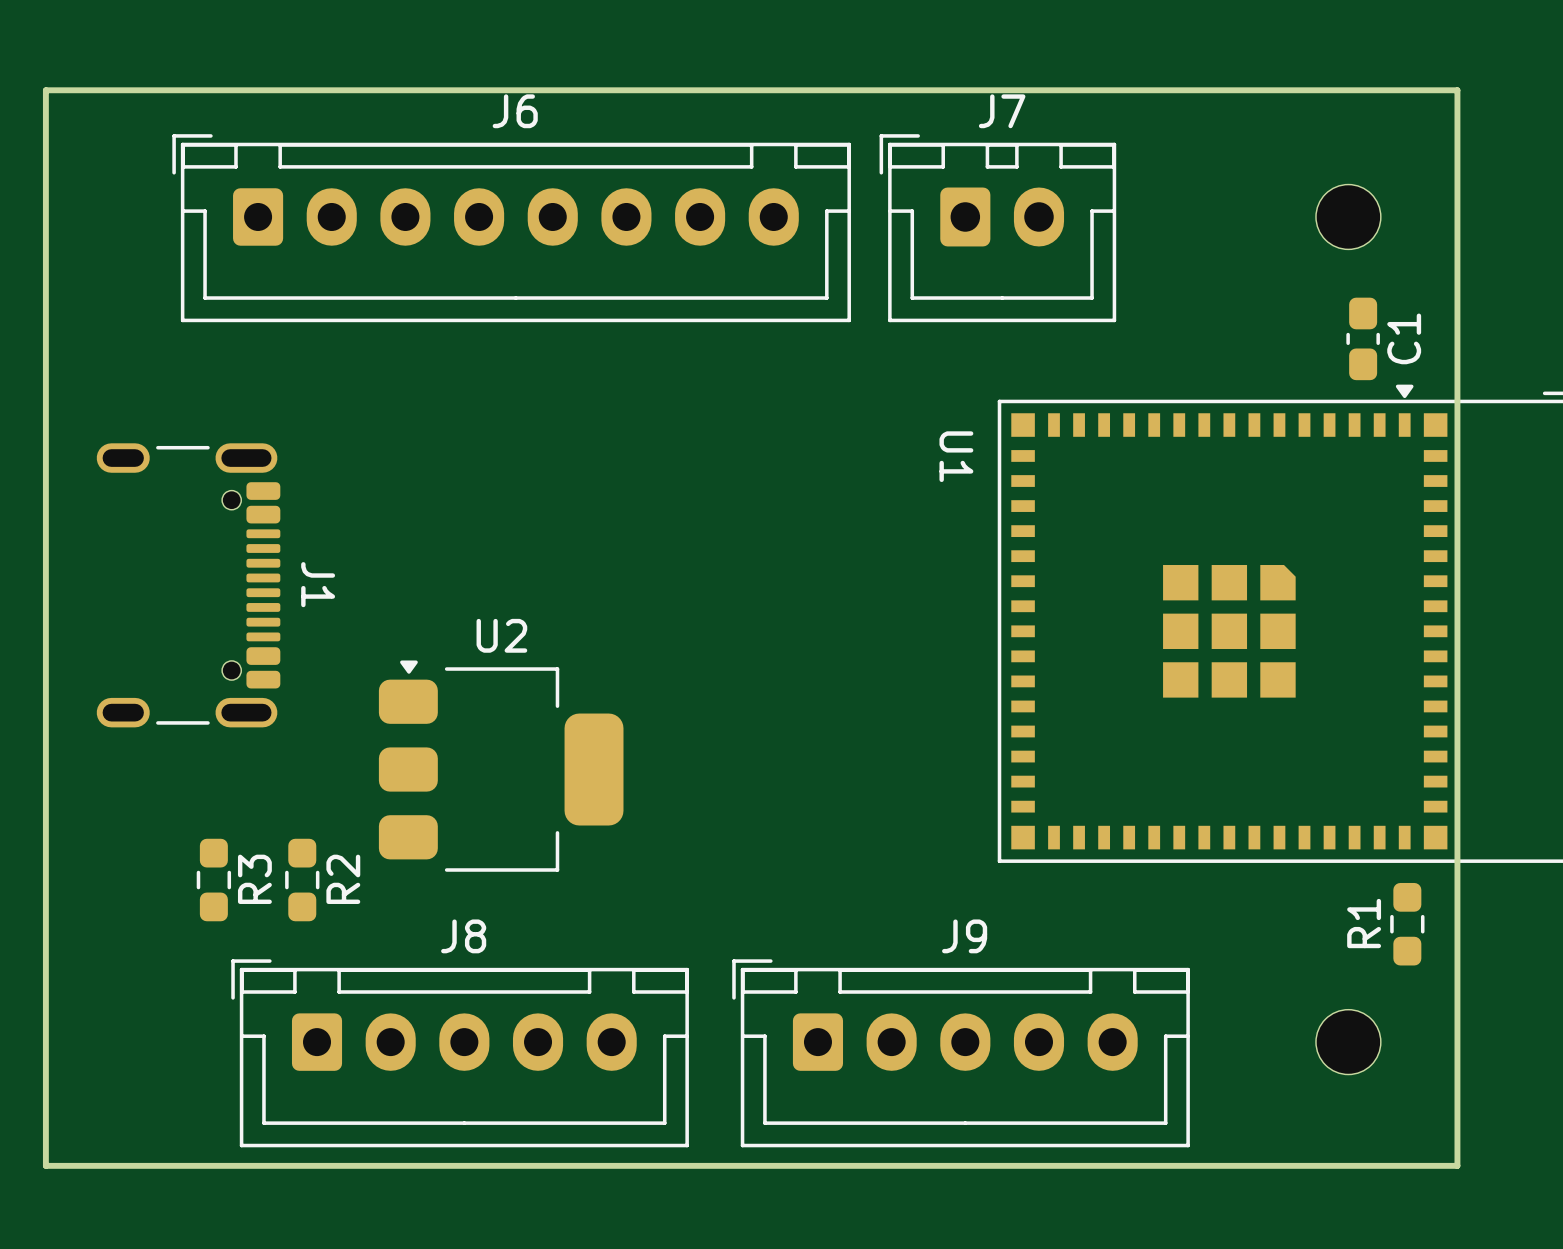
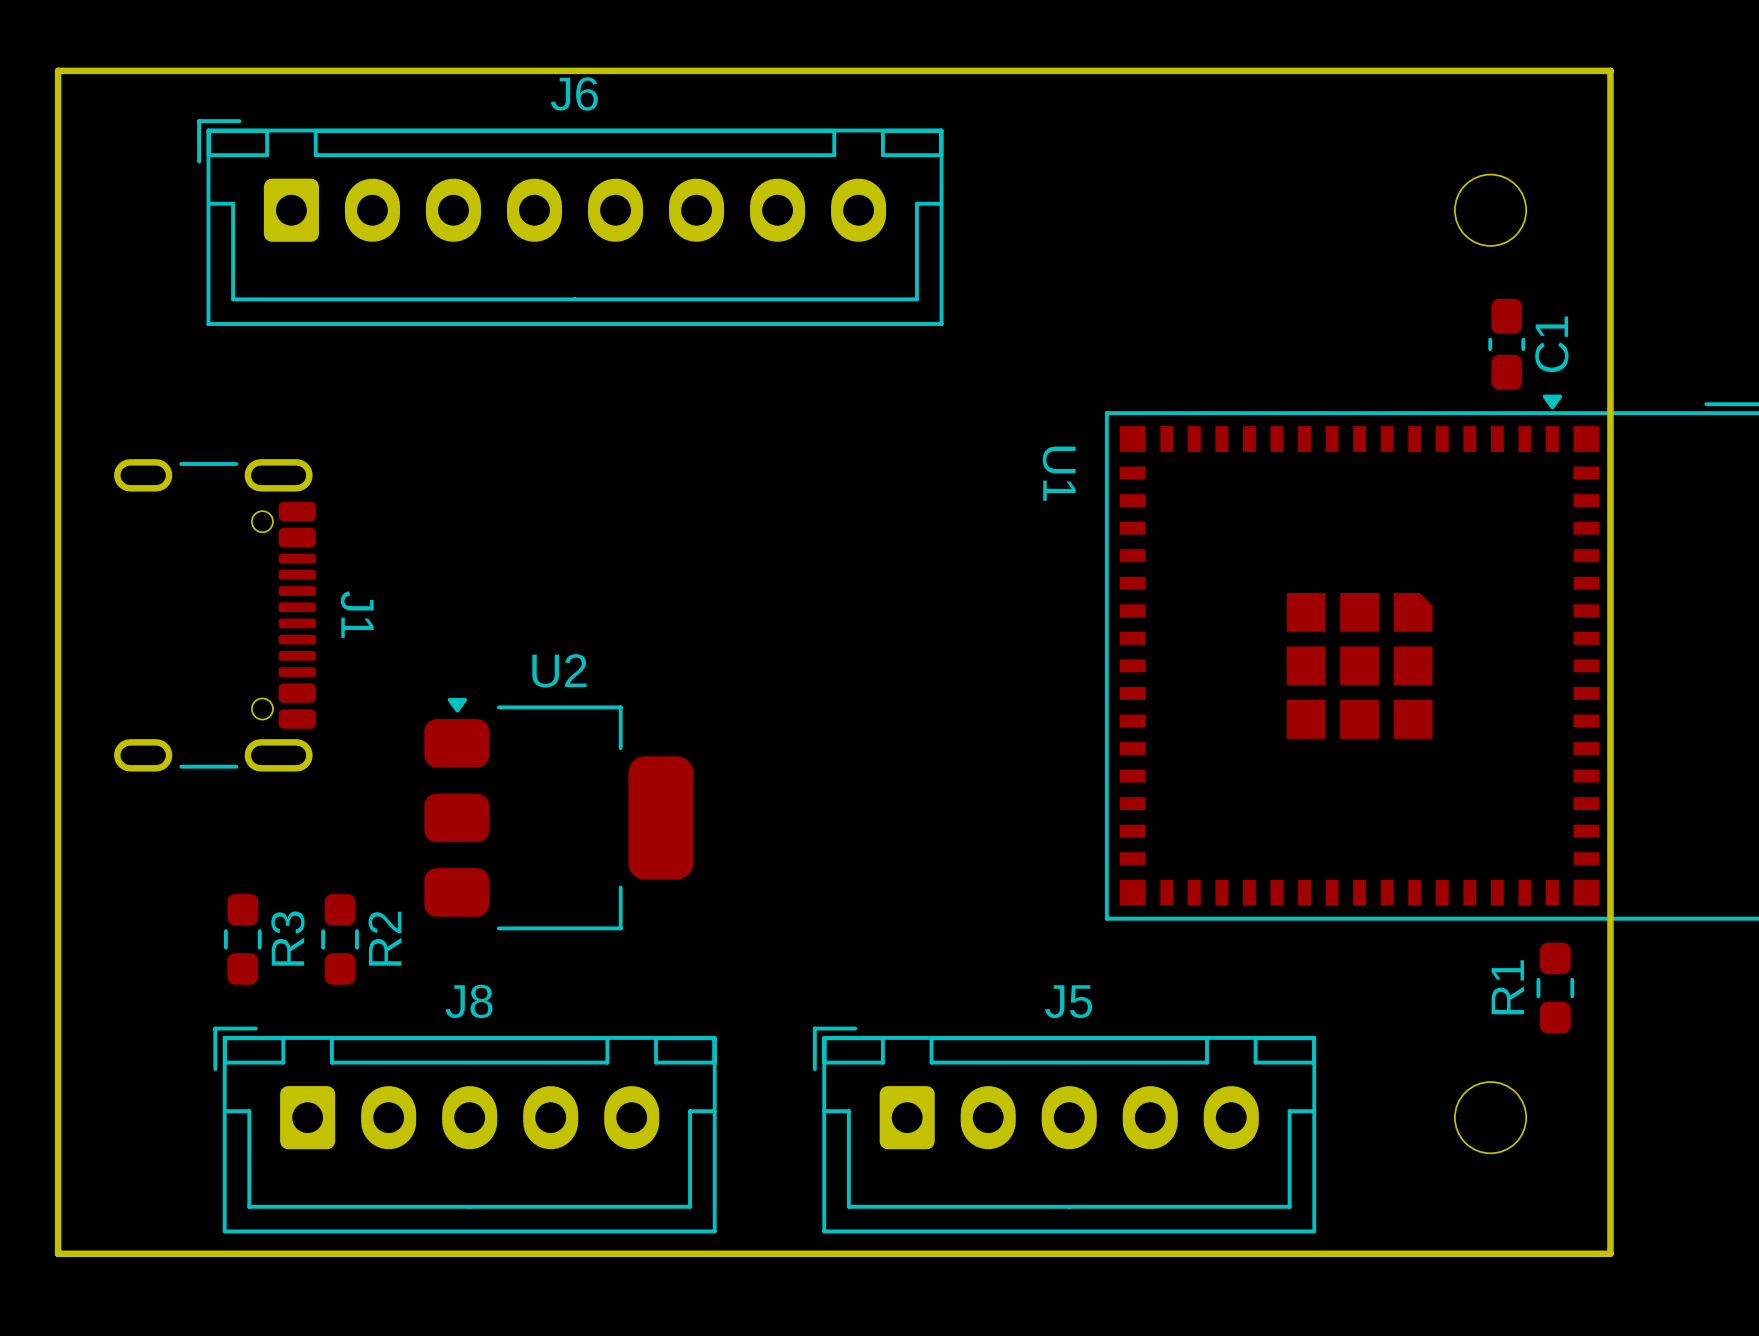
J7: (997, 228) -> none
J9 name: J9 (964, 936) -> J5 (1068, 1001)
J8 position: (460, 1053) -> (464, 1129)

